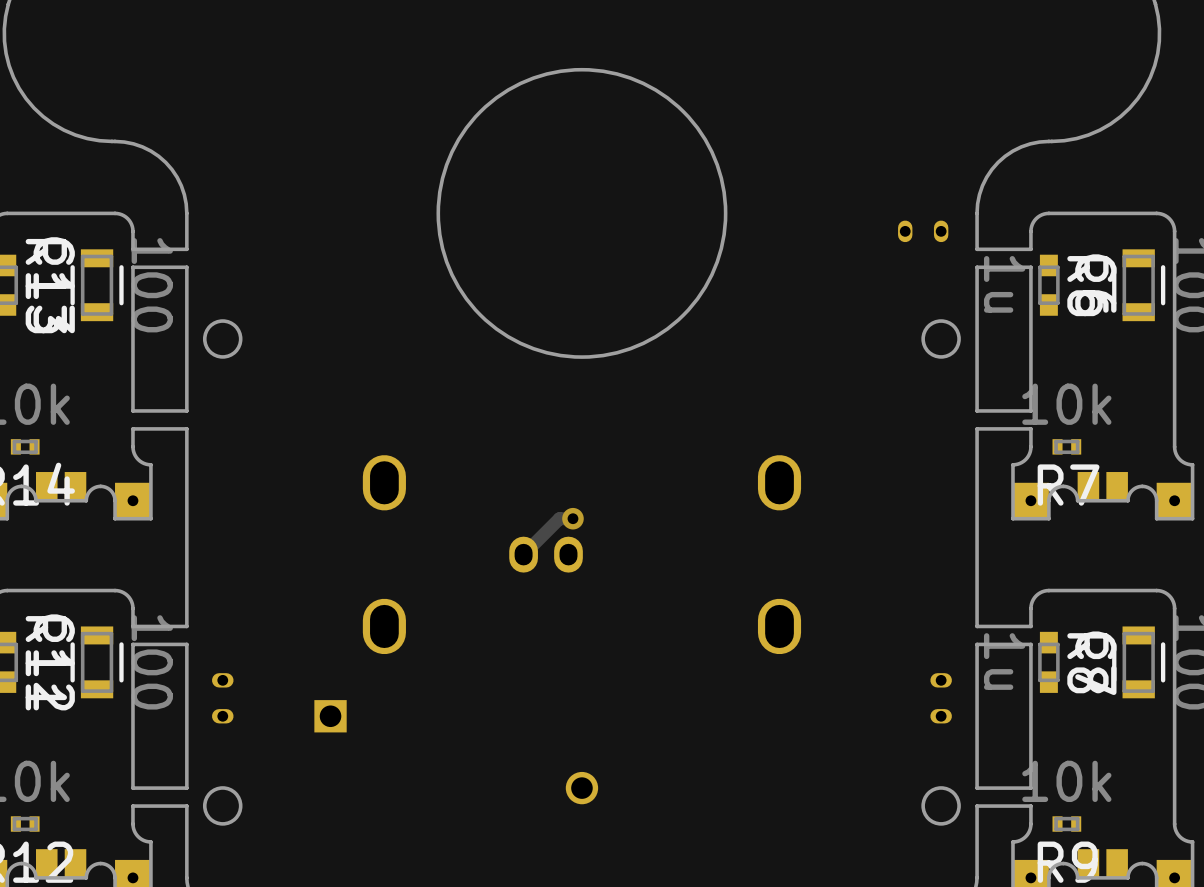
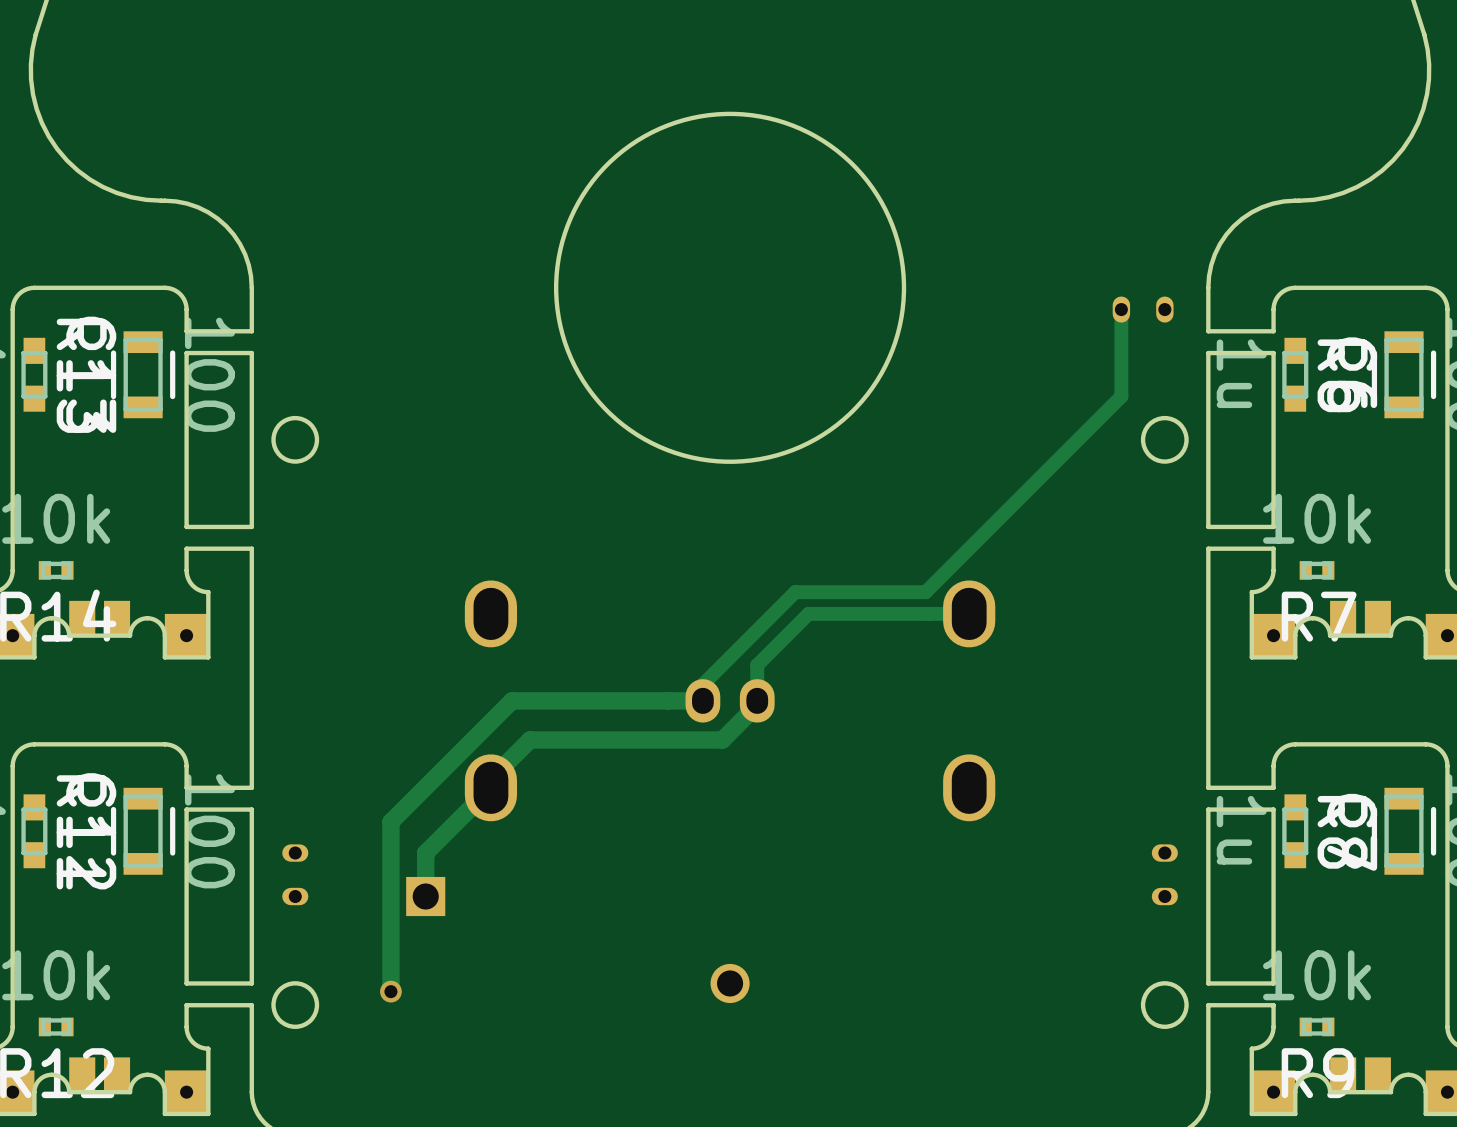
track: none -> (1121, 309) (1121, 396) (925, 592) (795, 592) (702, 684) (702, 700) (512, 700) (390, 822) (390, 991)
track: none -> (969, 613) (808, 613) (757, 665) (757, 705) (722, 739) (530, 739) (490, 779) (490, 787) (425, 853) (425, 896)
track: (572, 518) (559, 518) (523, 554) -> none
via: (572, 518) -> none
part position: (546, 554) -> (730, 700)
via: none -> (390, 991)

